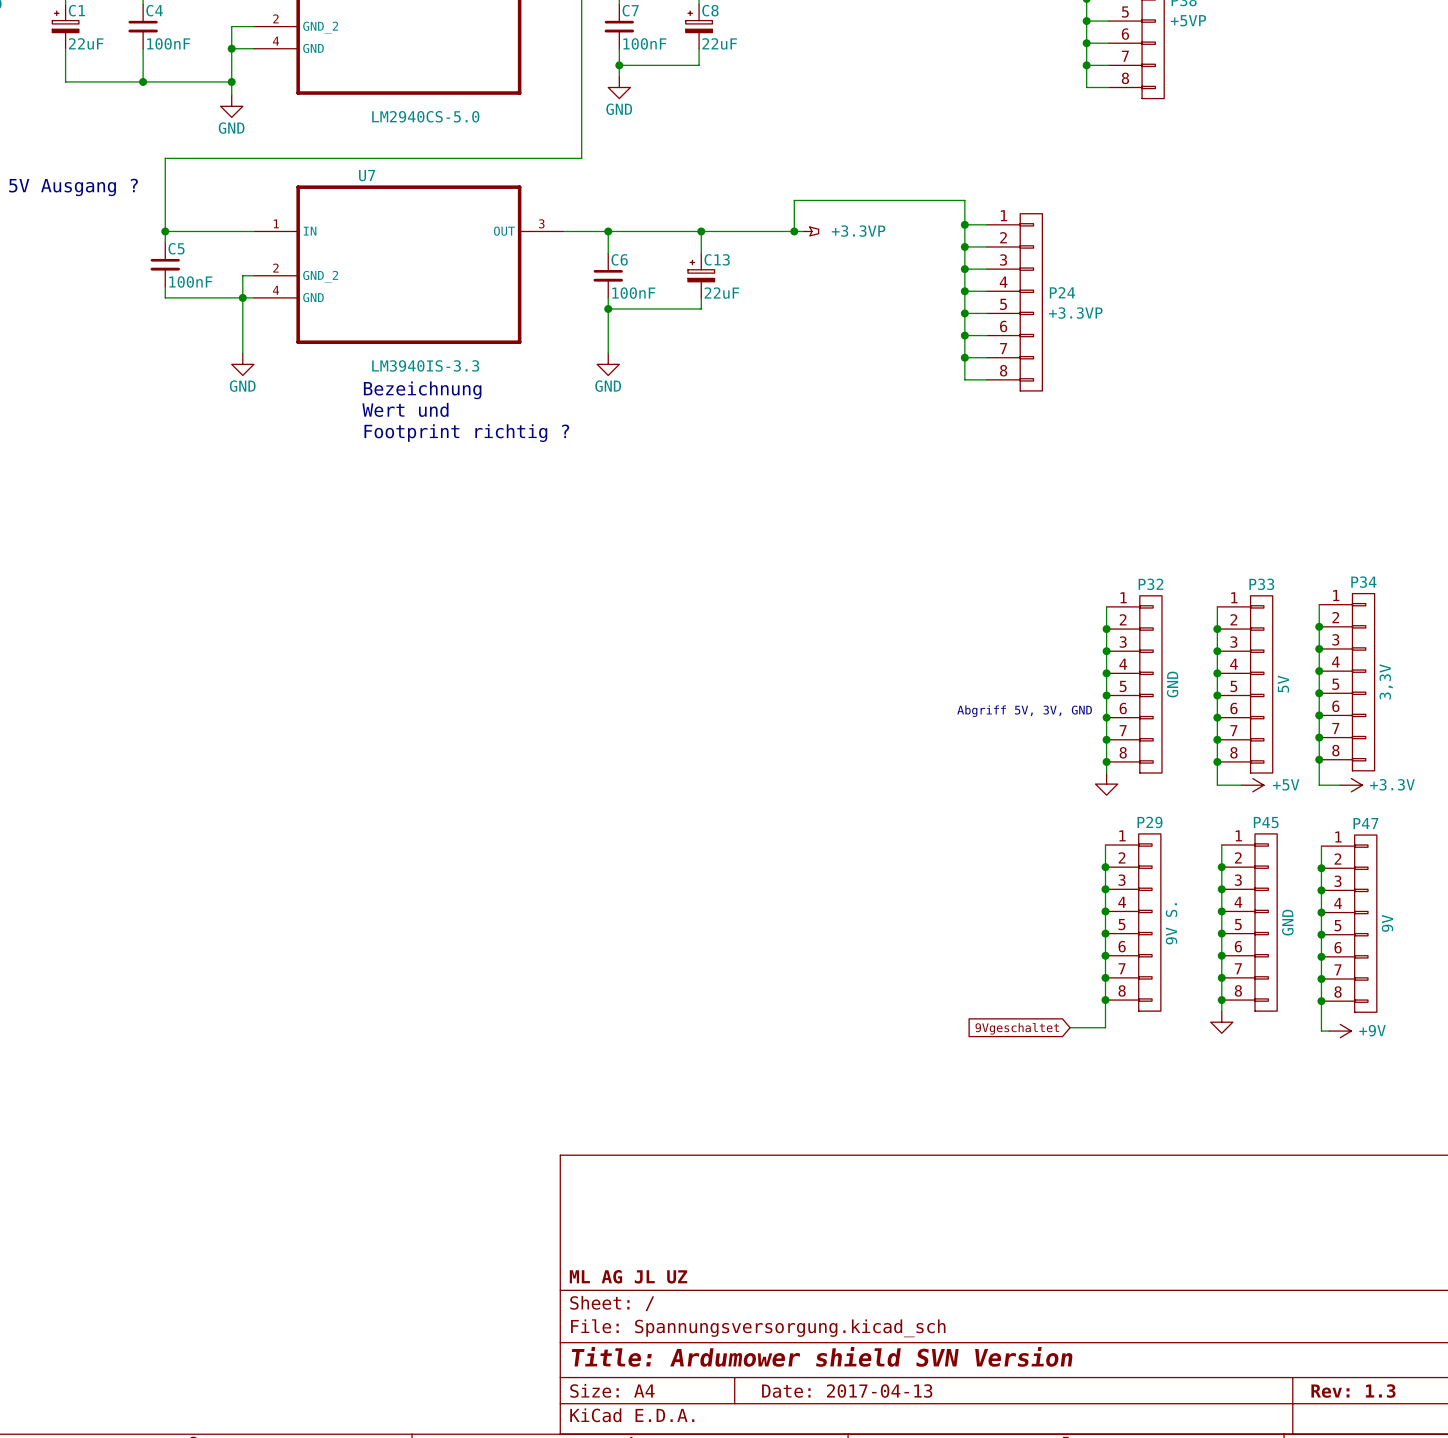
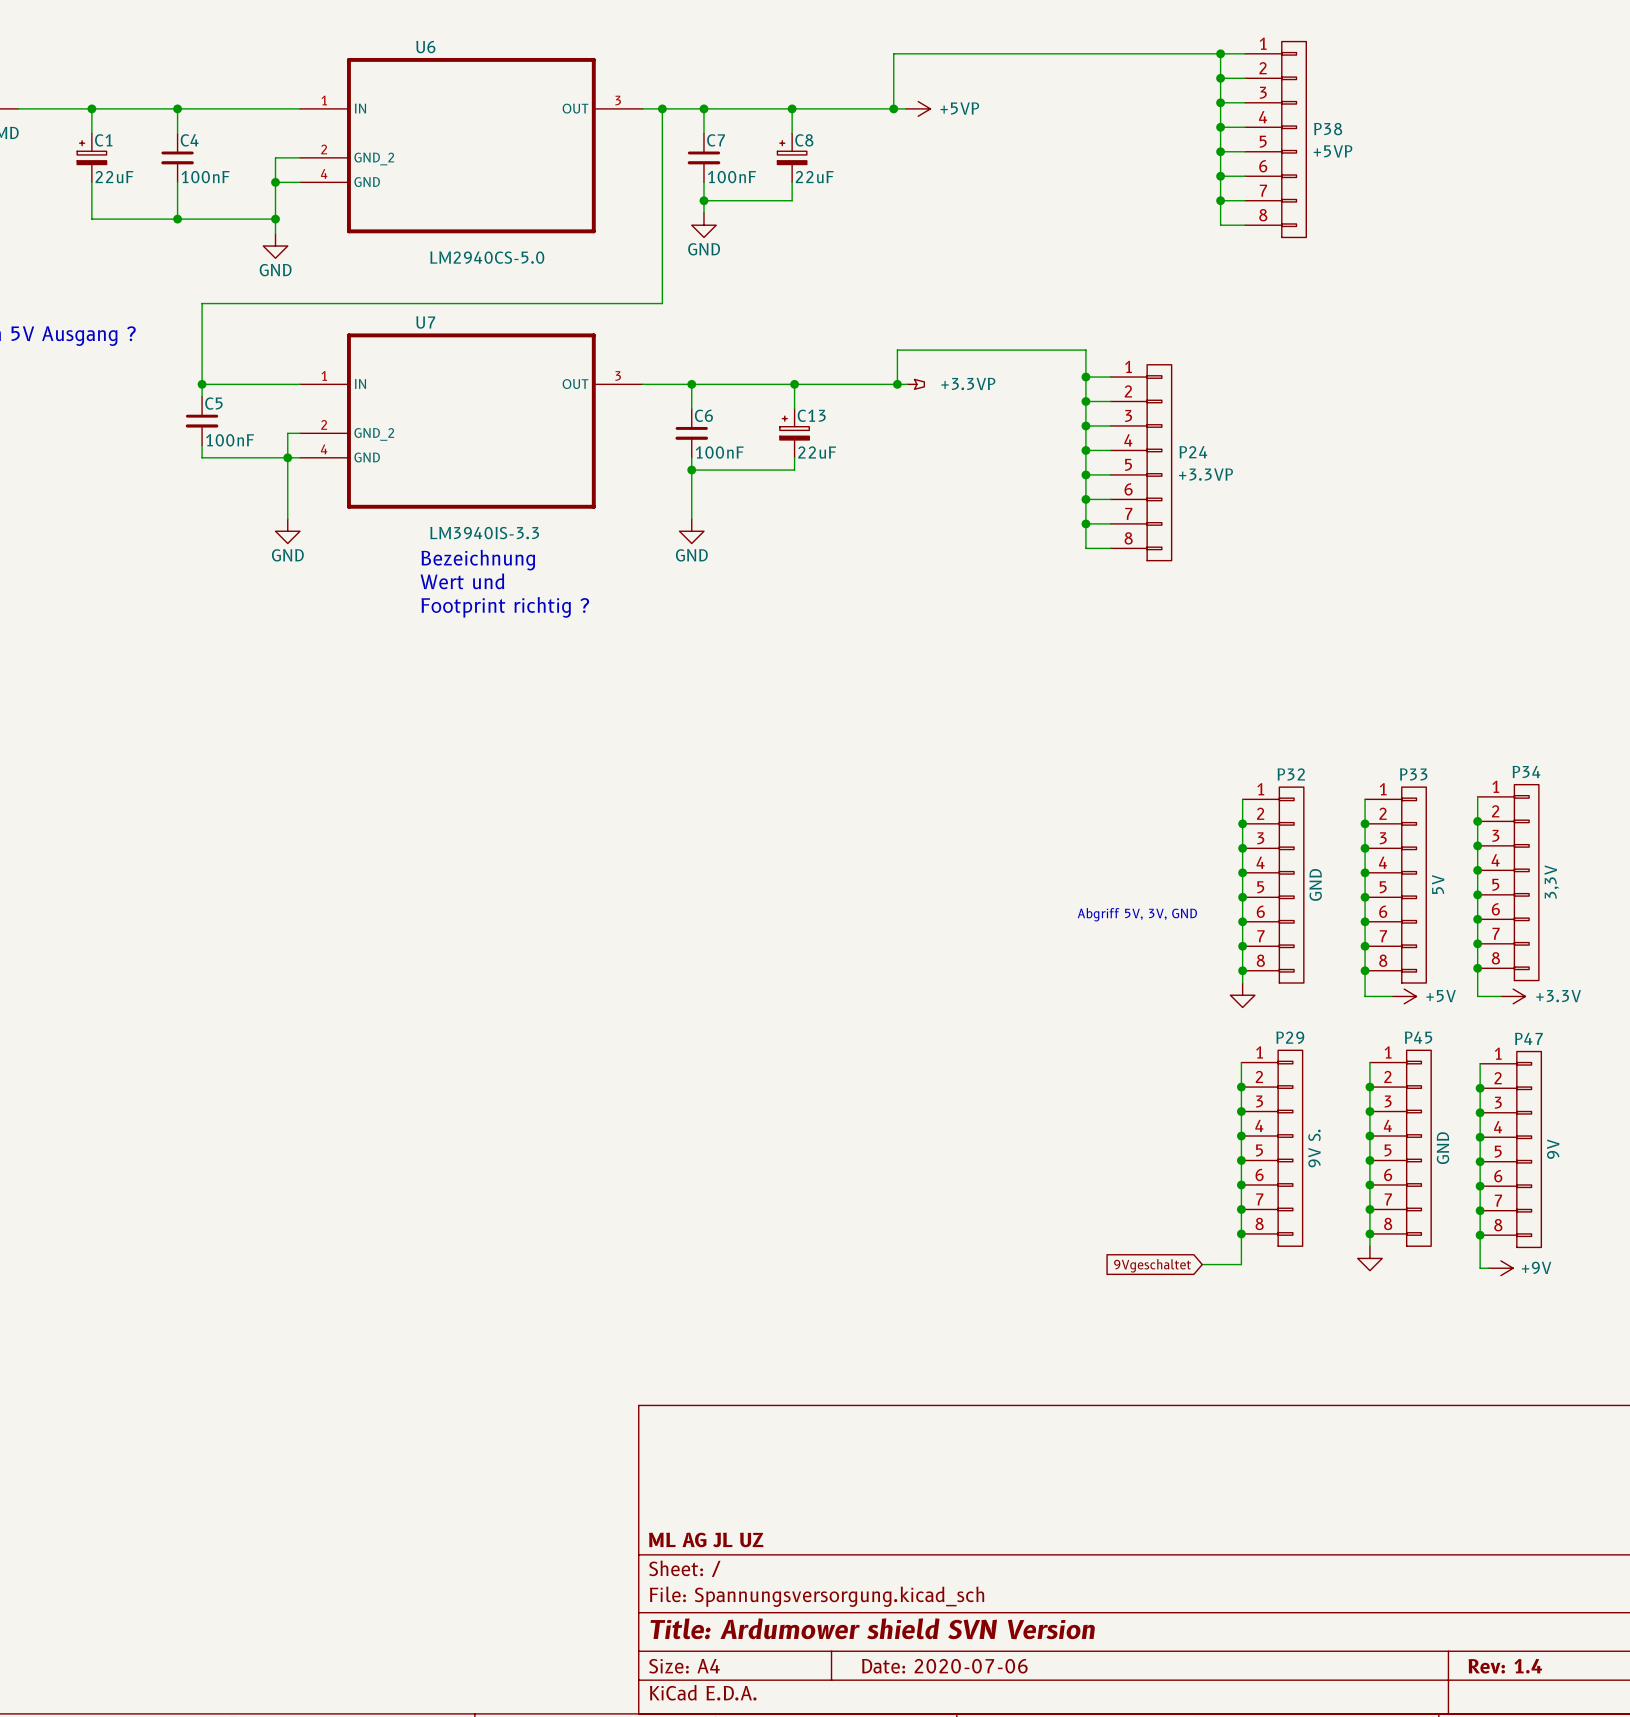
title block: Date: 2017-04-13 (847, 1391) -> Date: 2020-07-06 (944, 1666)
title block: Rev: 1.3 (1353, 1391) -> Rev: 1.4 (1505, 1666)

